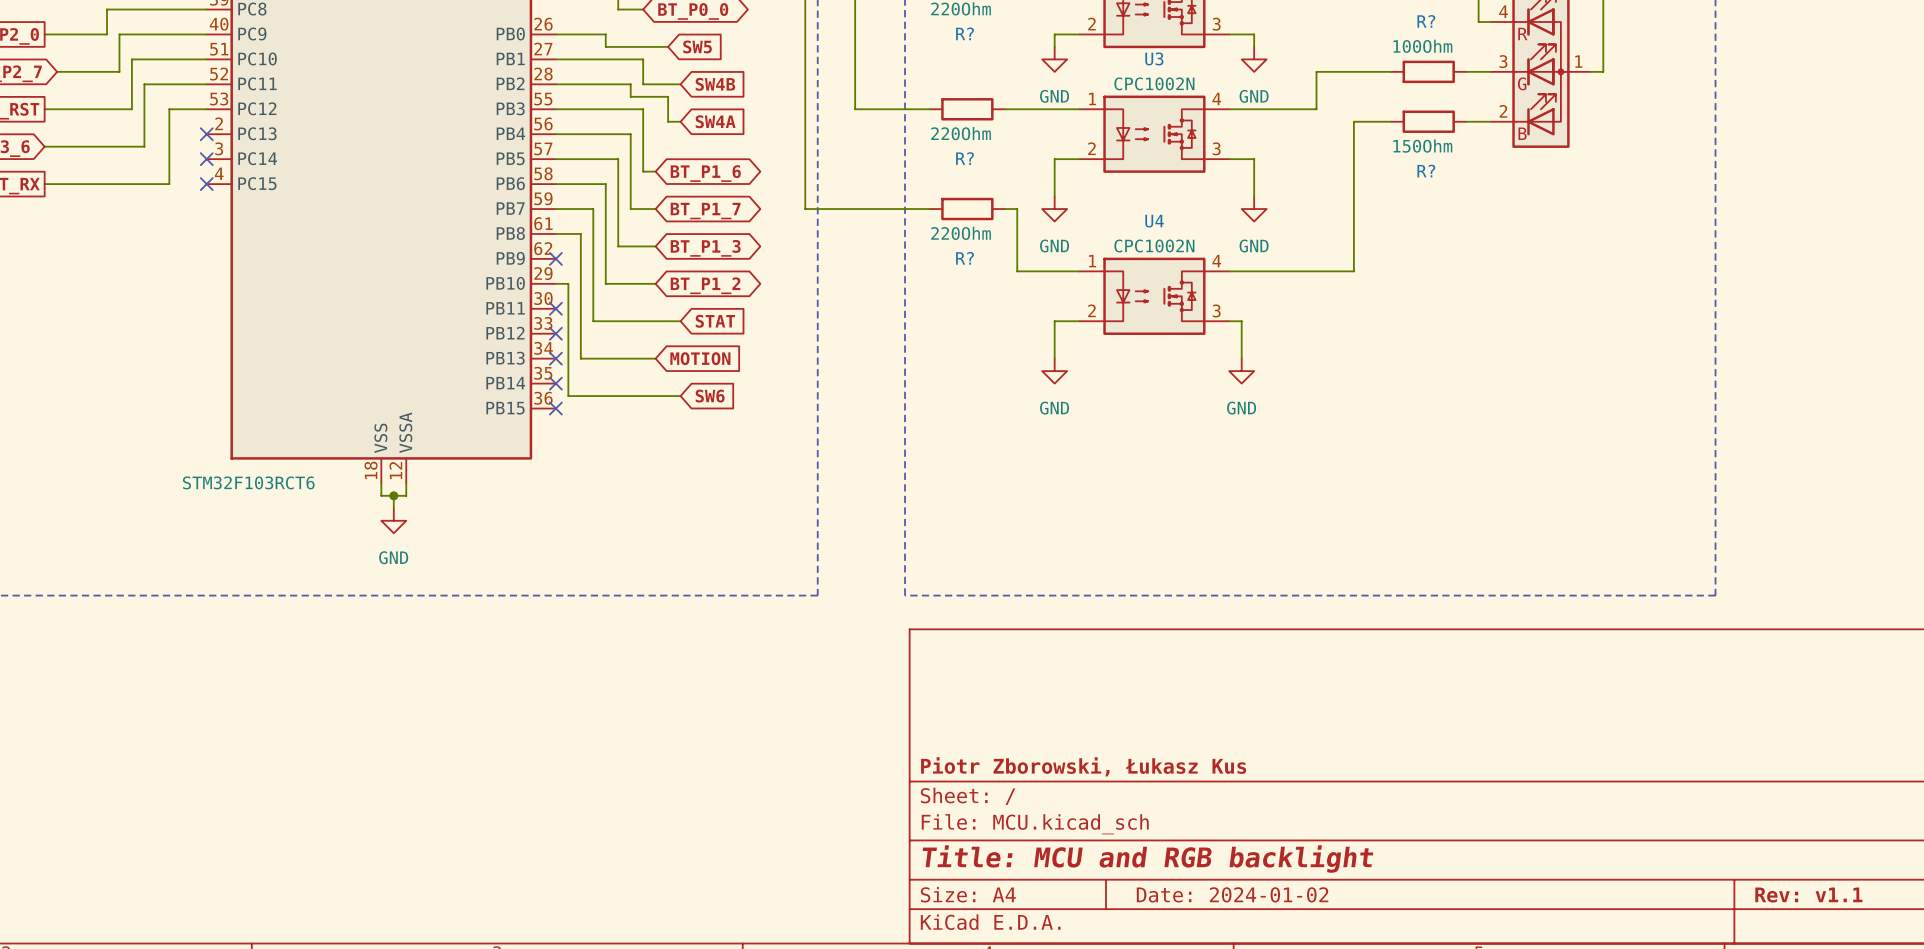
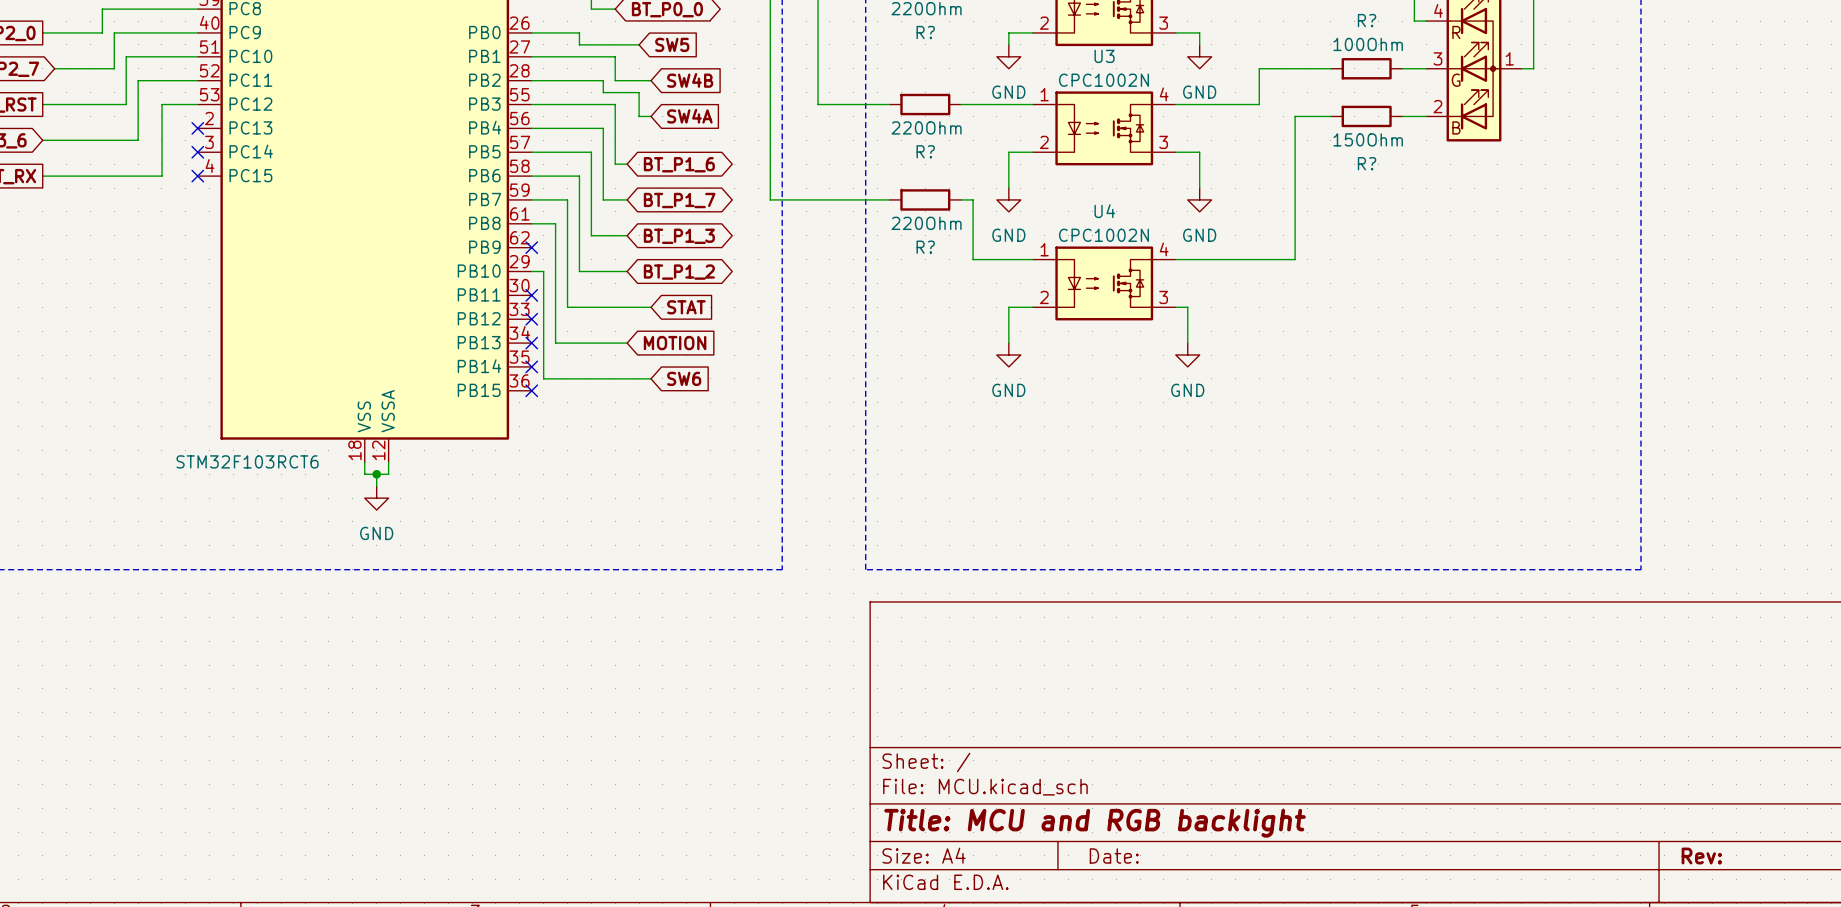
title block: Piotr Zborowski, Łukasz Kus (1083, 766) -> none
title block: Date: 2024-01-02 (1232, 894) -> Date: (1114, 855)
title block: Rev: v1.1 (1808, 895) -> Rev: (1701, 855)

